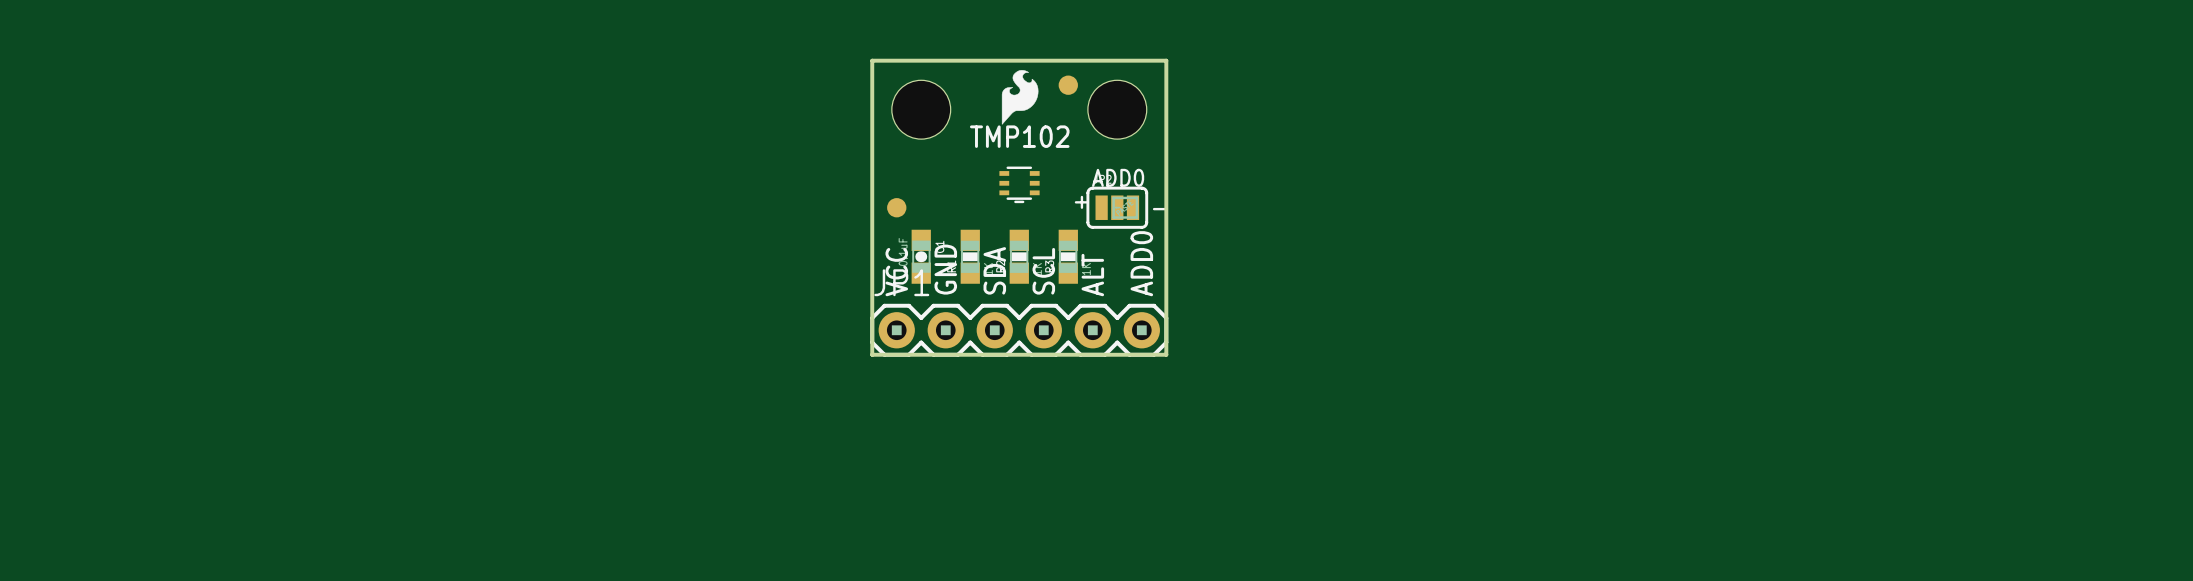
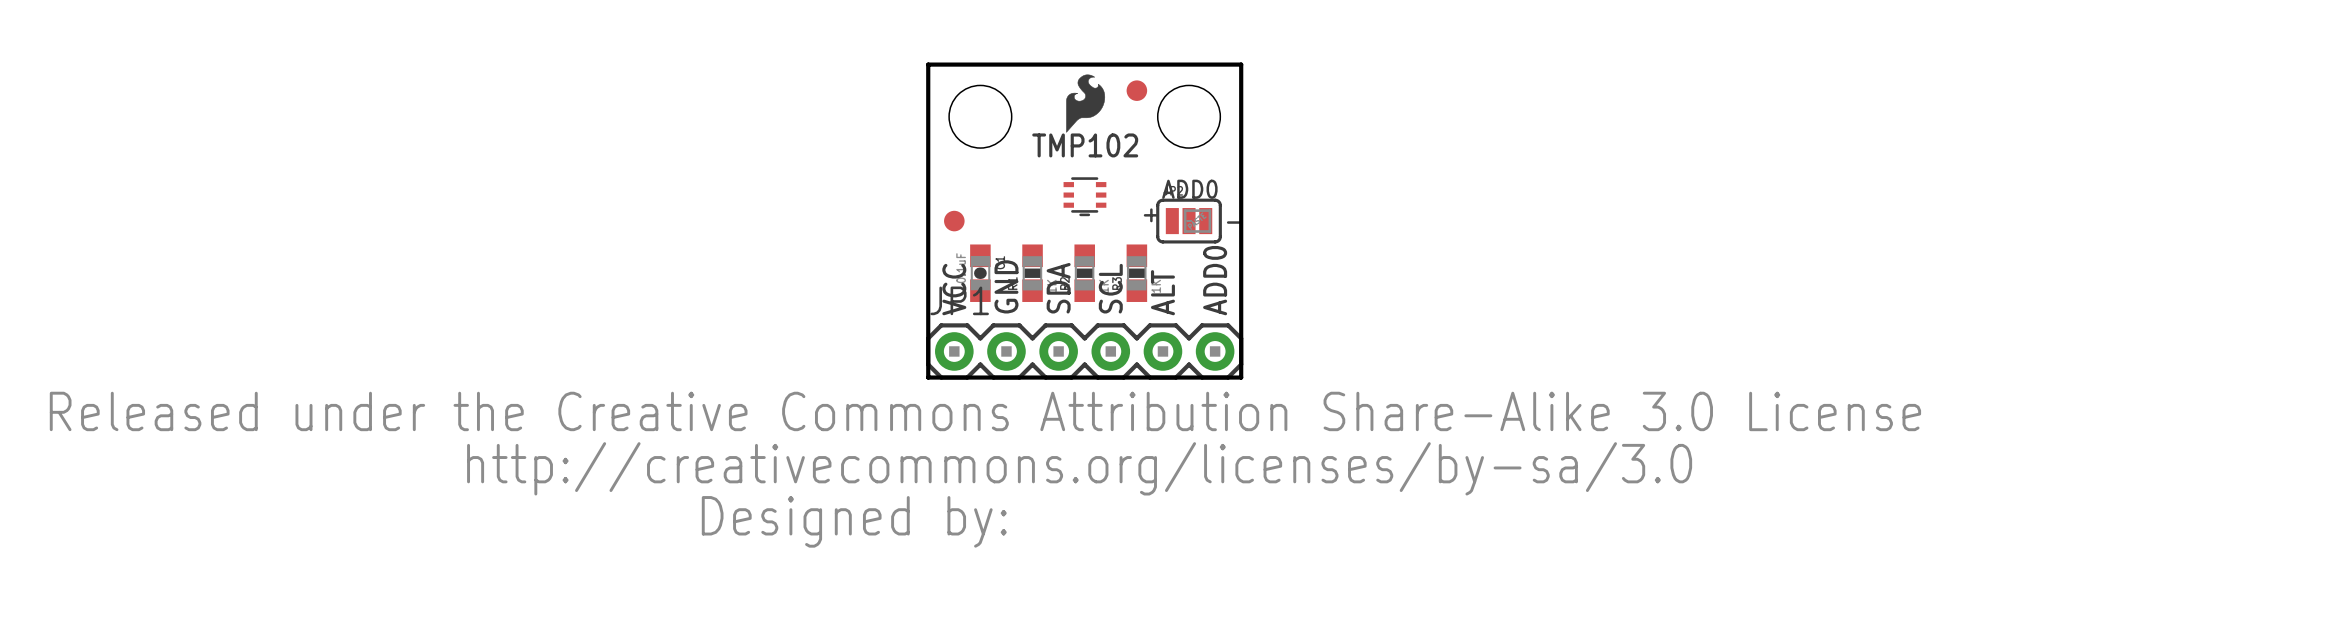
drawing: none -> [49, 391, 1922, 548]

